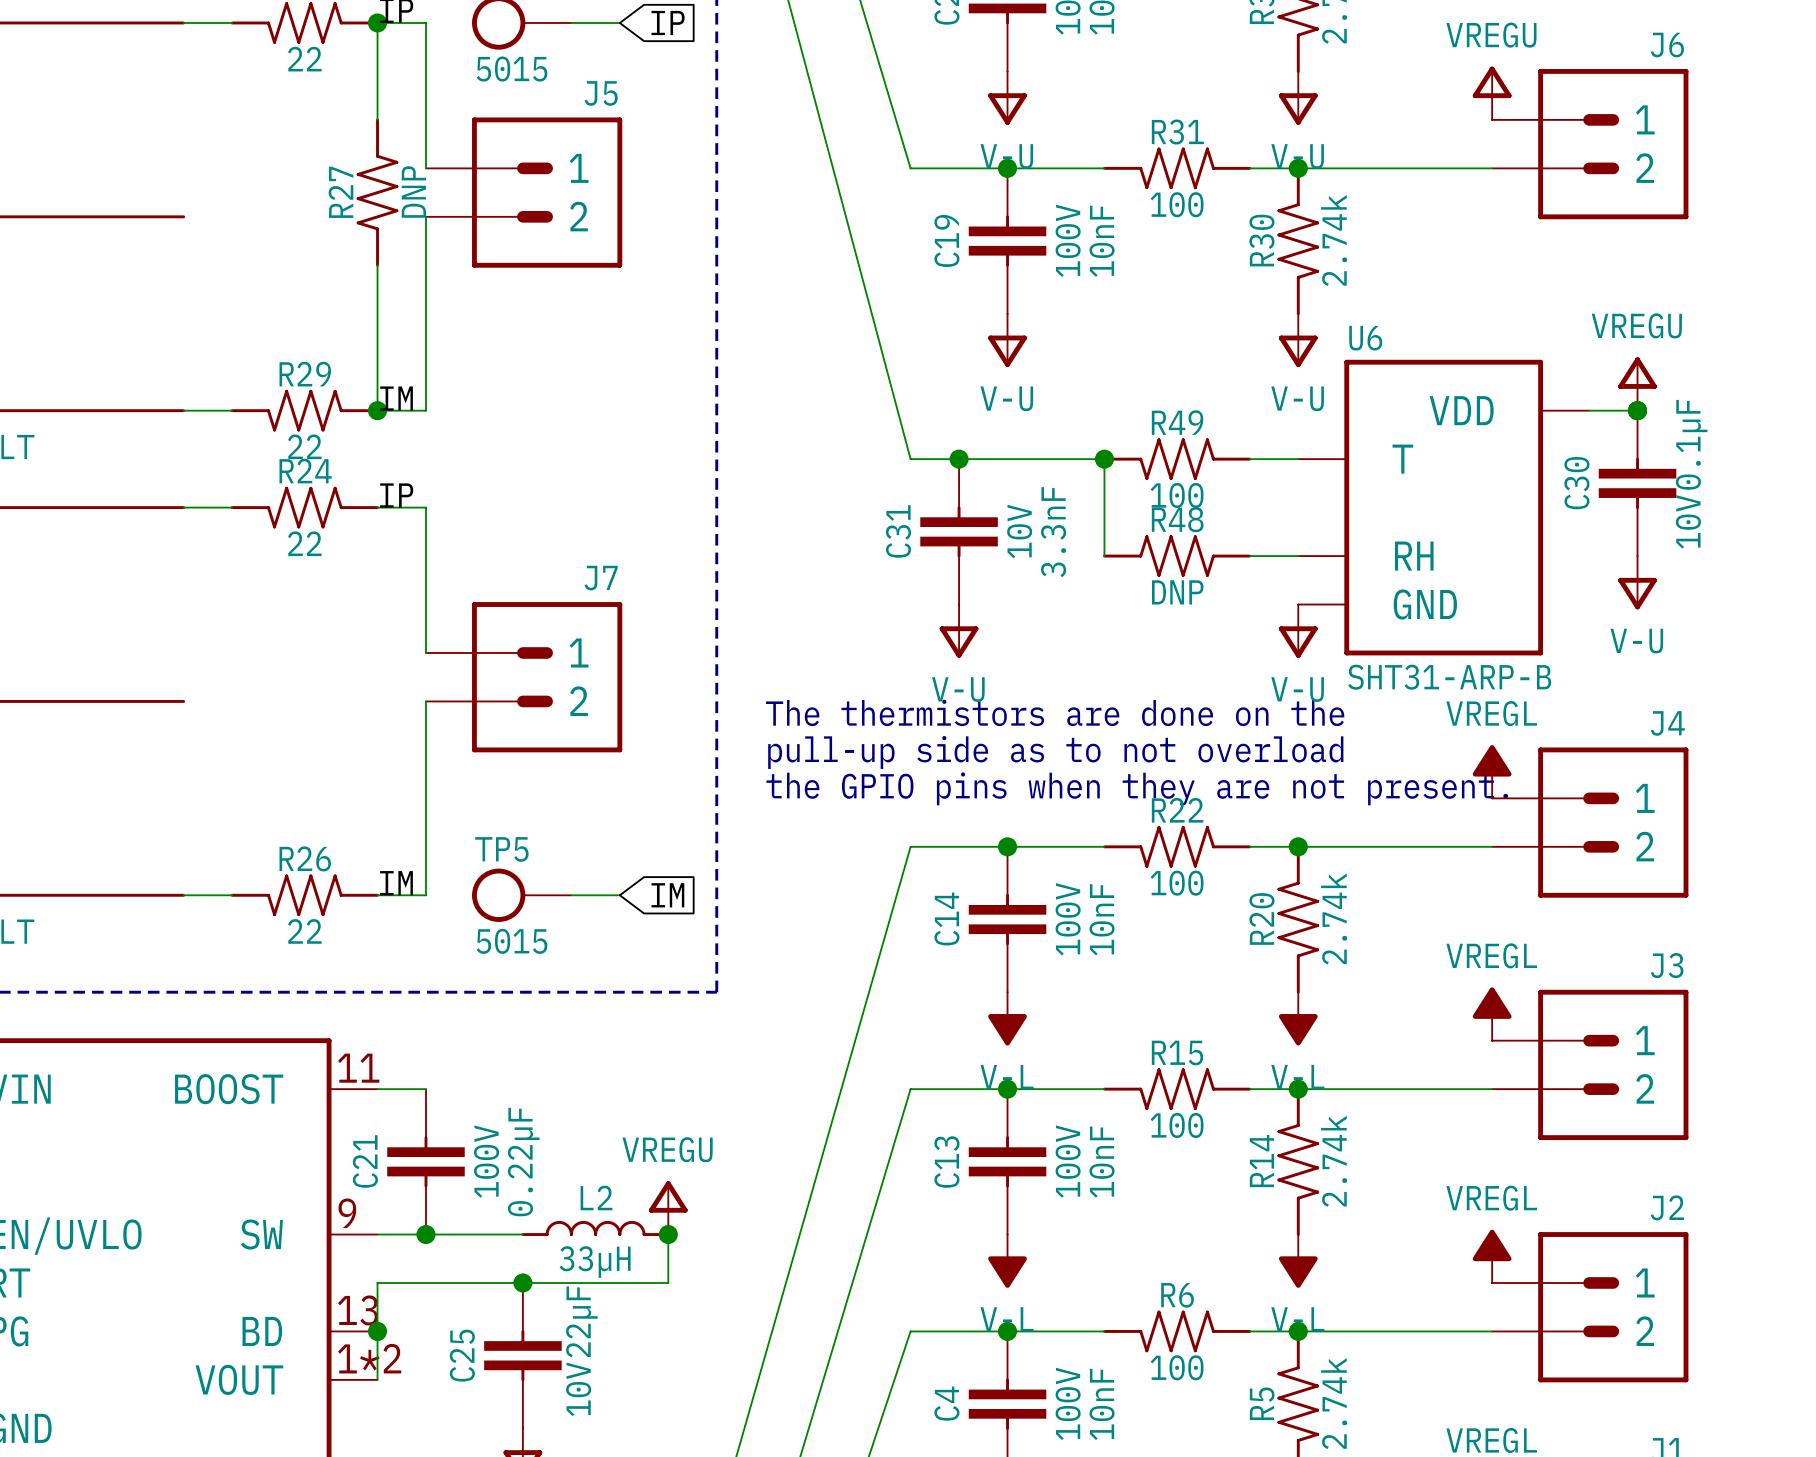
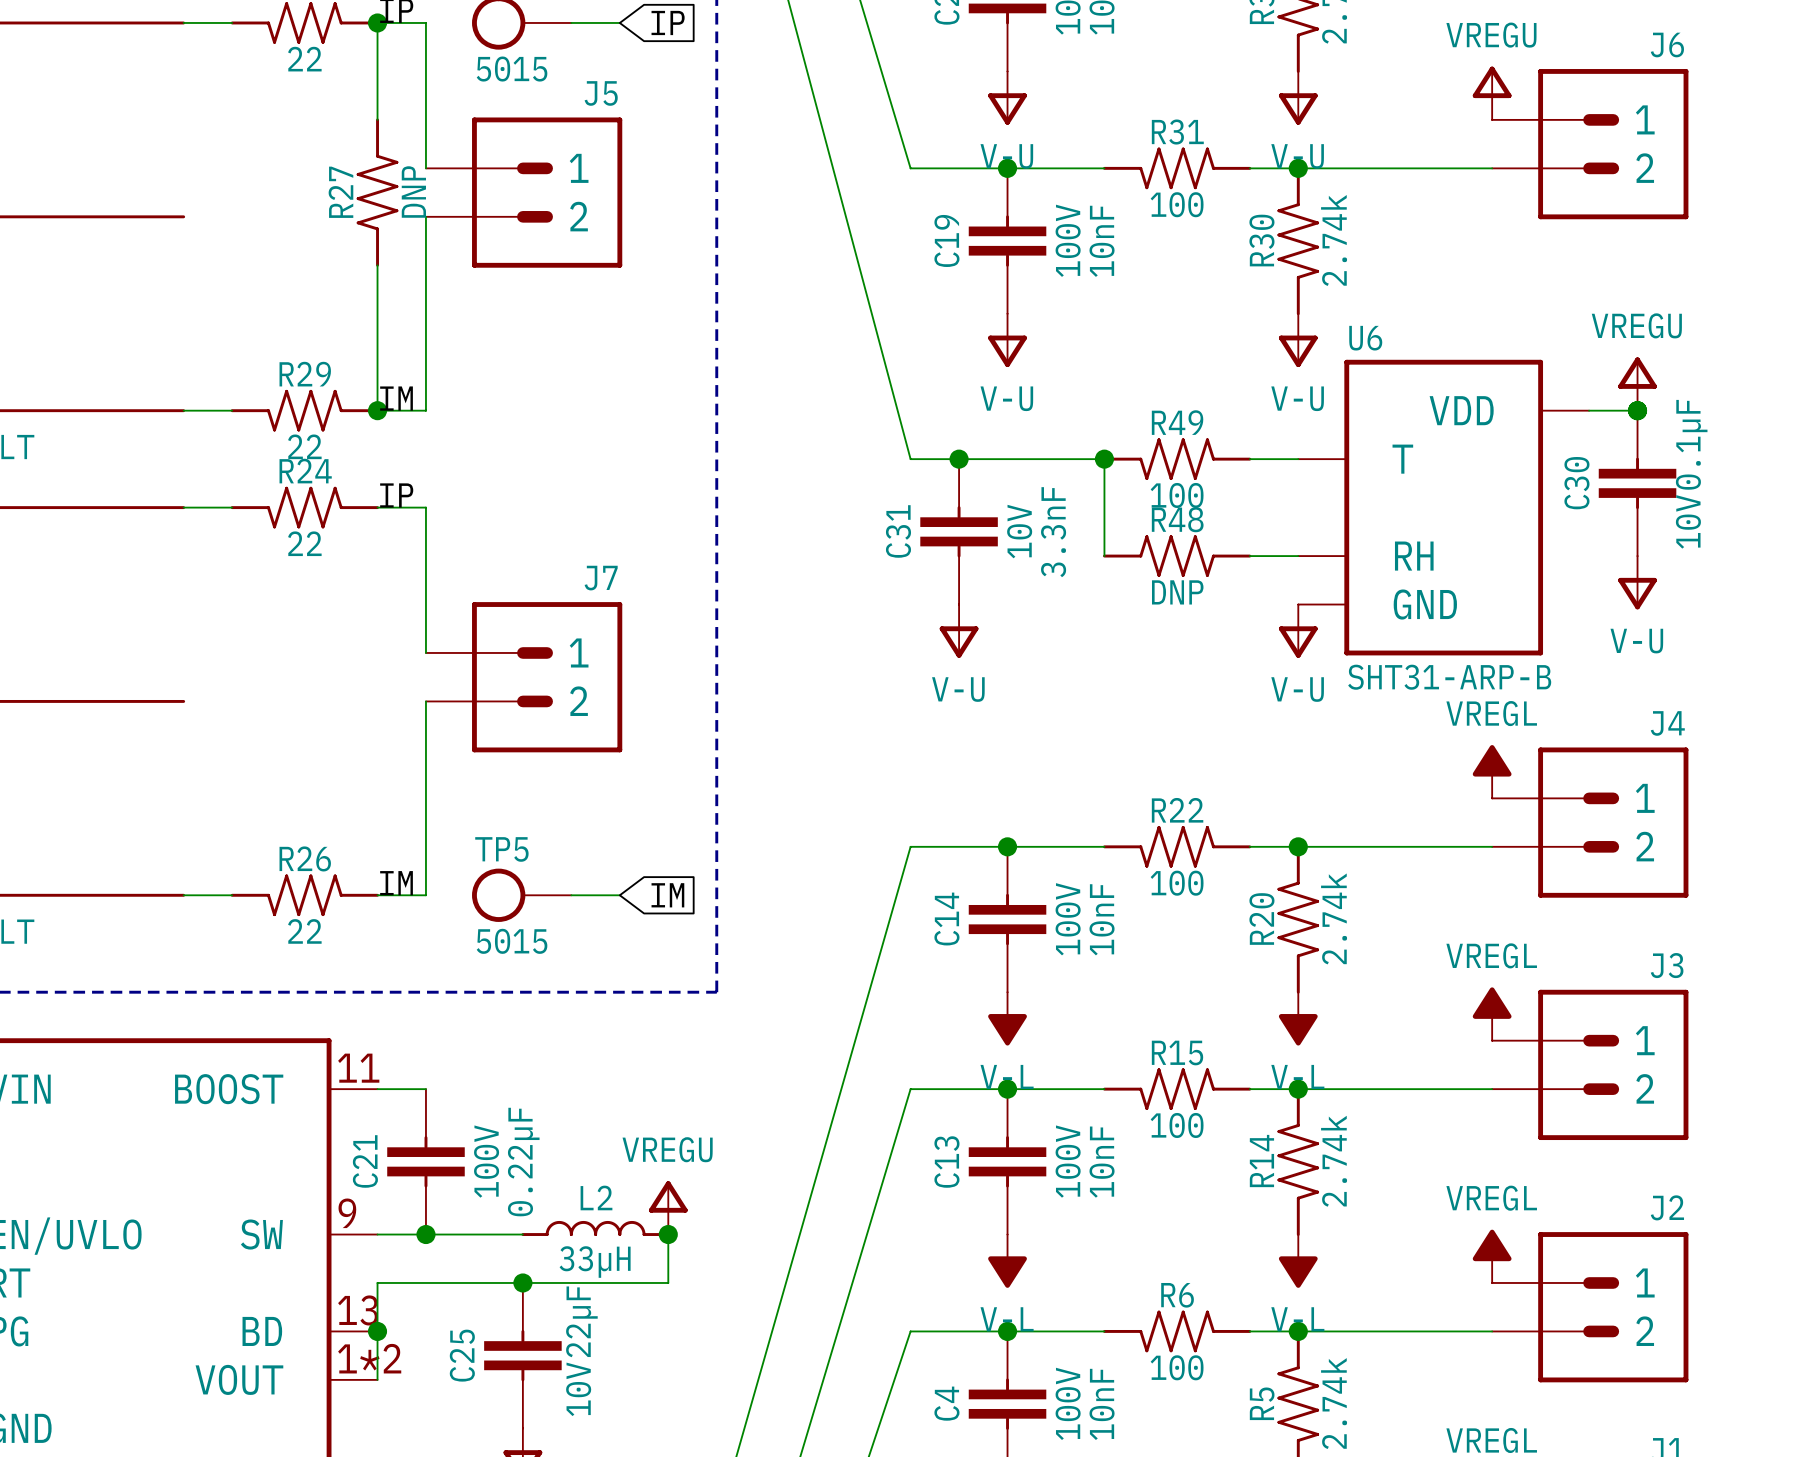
text: The thermistors are done on the (1055, 712) -> none
text: pull-up side as to not overload (1055, 752) -> none
text: the GPIO pins when they are not present. (1137, 788) -> none

